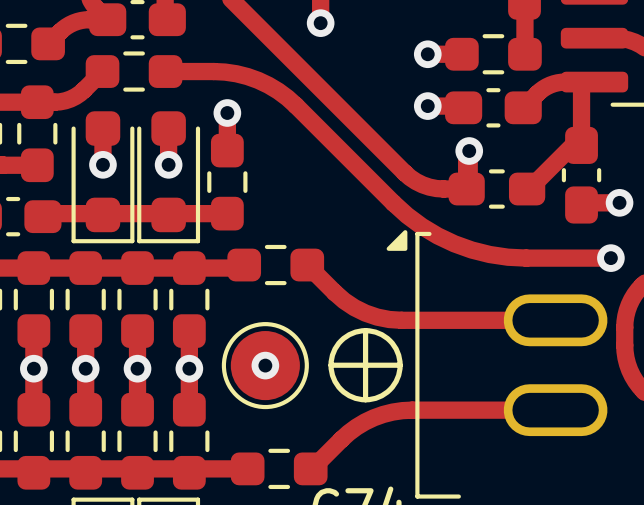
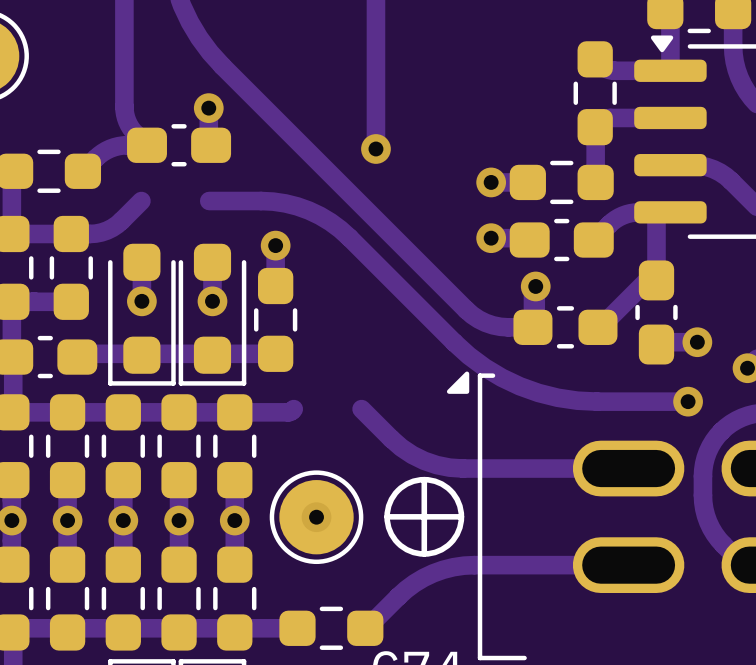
part: (134, 71) -> none
part: (275, 265) -> none

